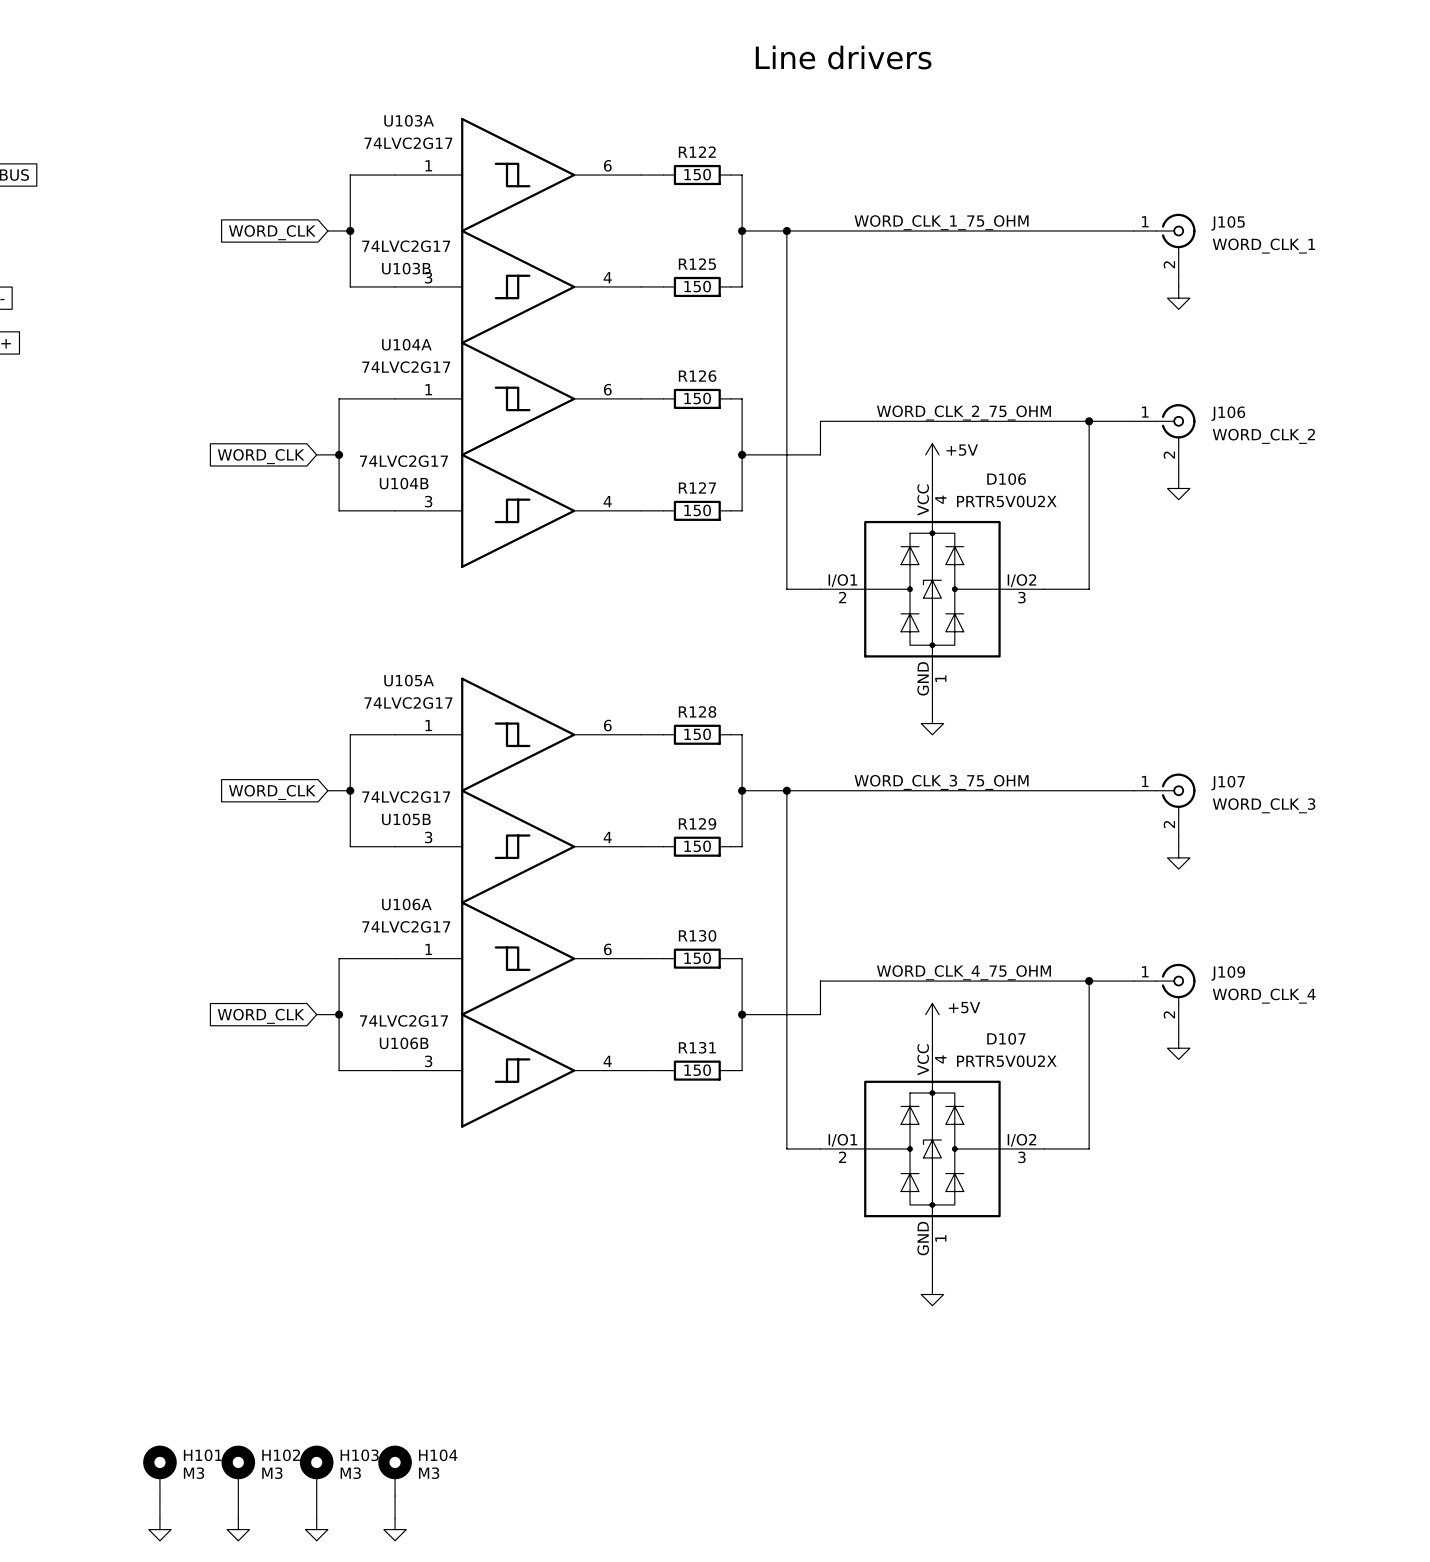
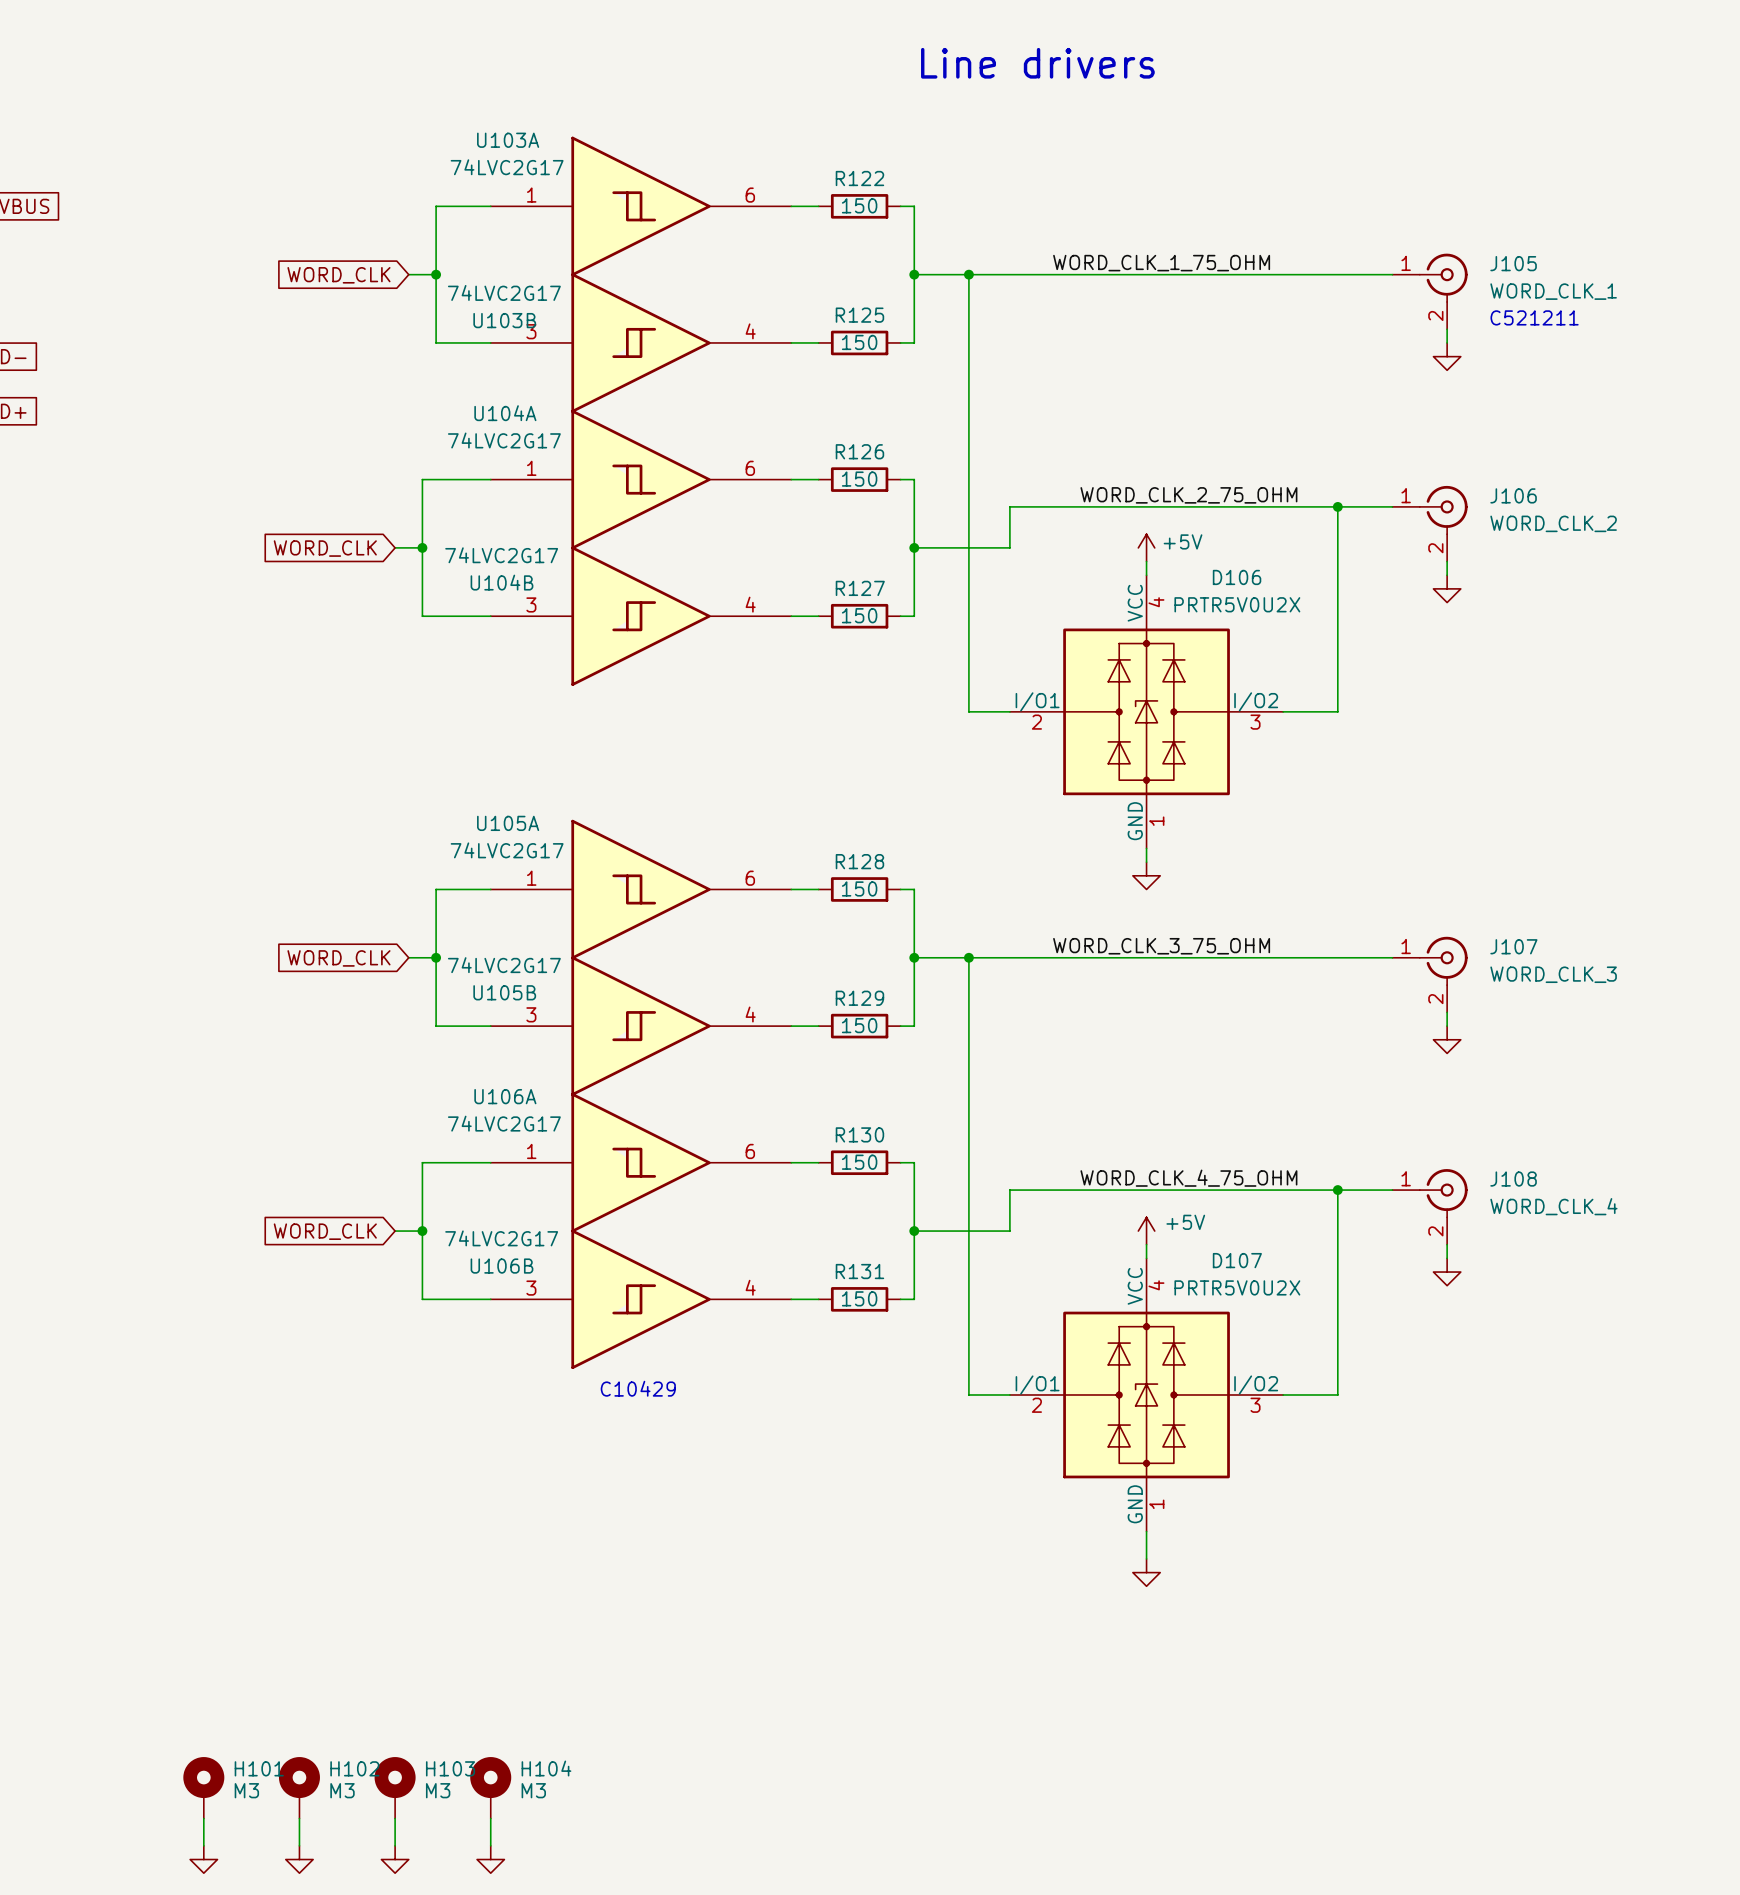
text: none -> C521211 (1534, 317)
J109 name: J109 (1228, 973) -> J108 (1513, 1179)
text: none -> C10429 (638, 1388)

